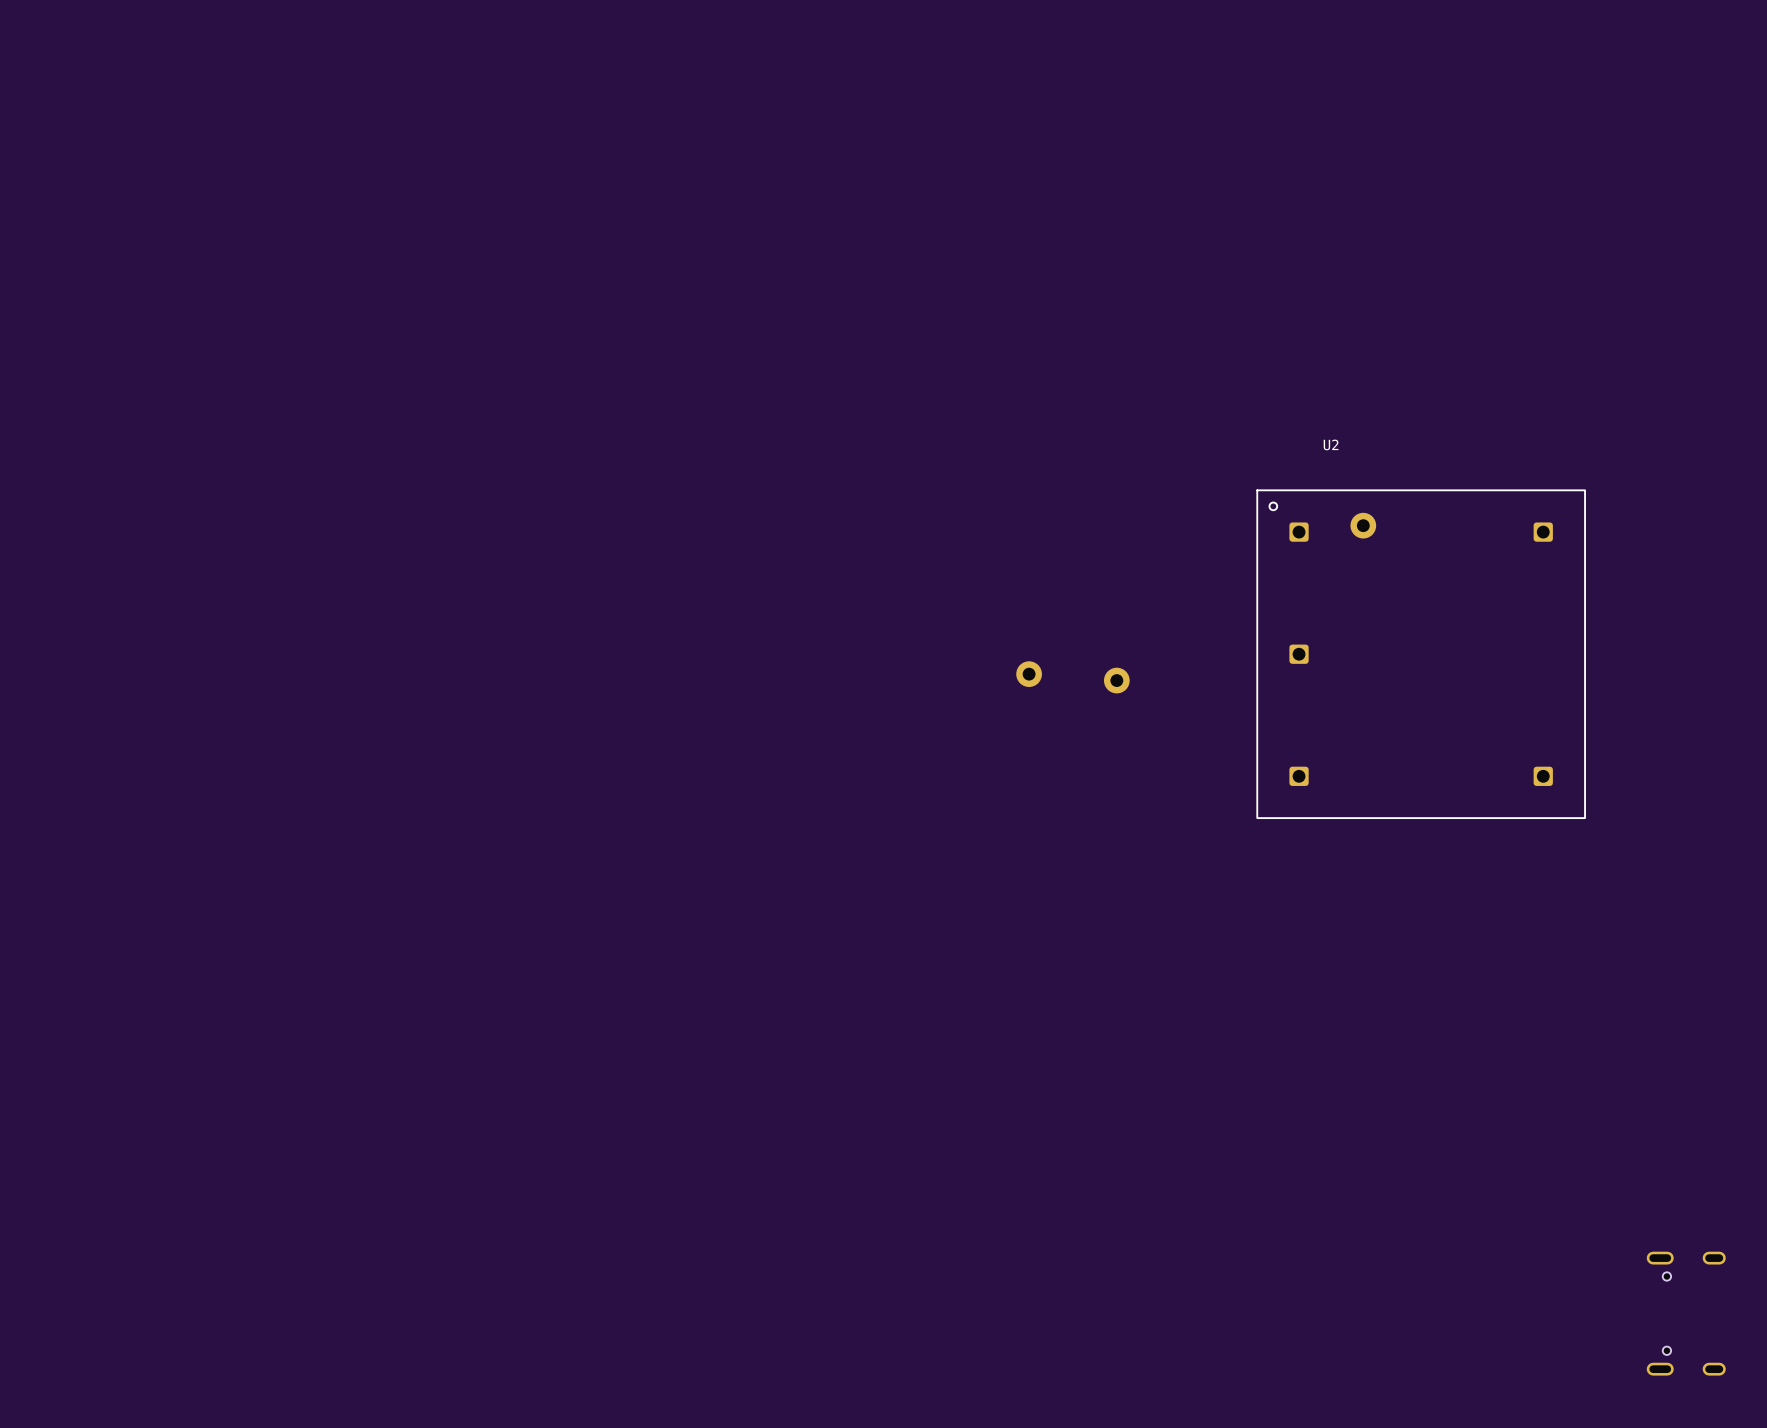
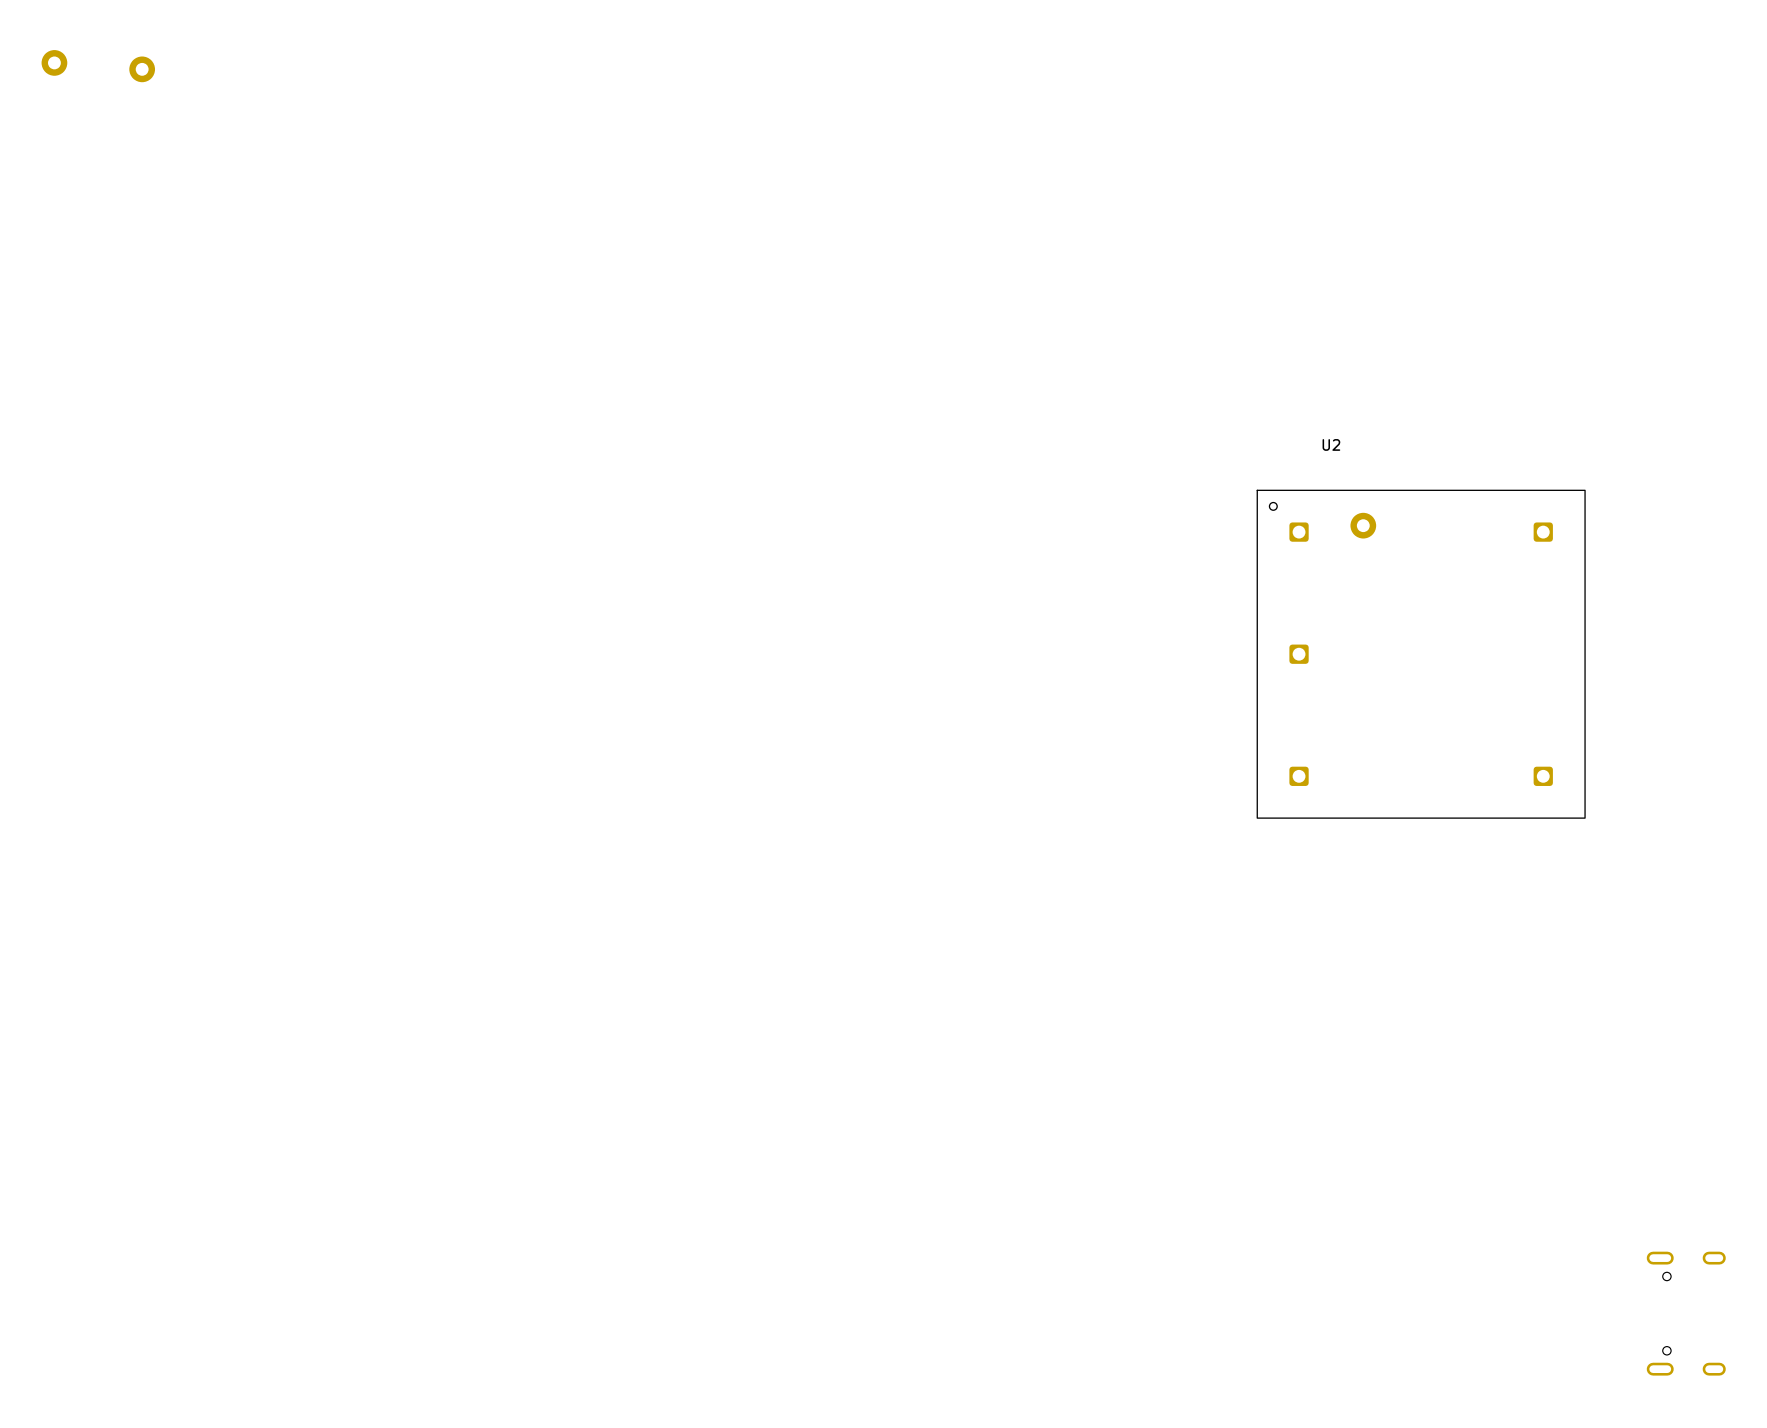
part: none -> (54, 62)
part: none -> (142, 69)
part: (1029, 674) -> none
part: (1116, 680) -> none

